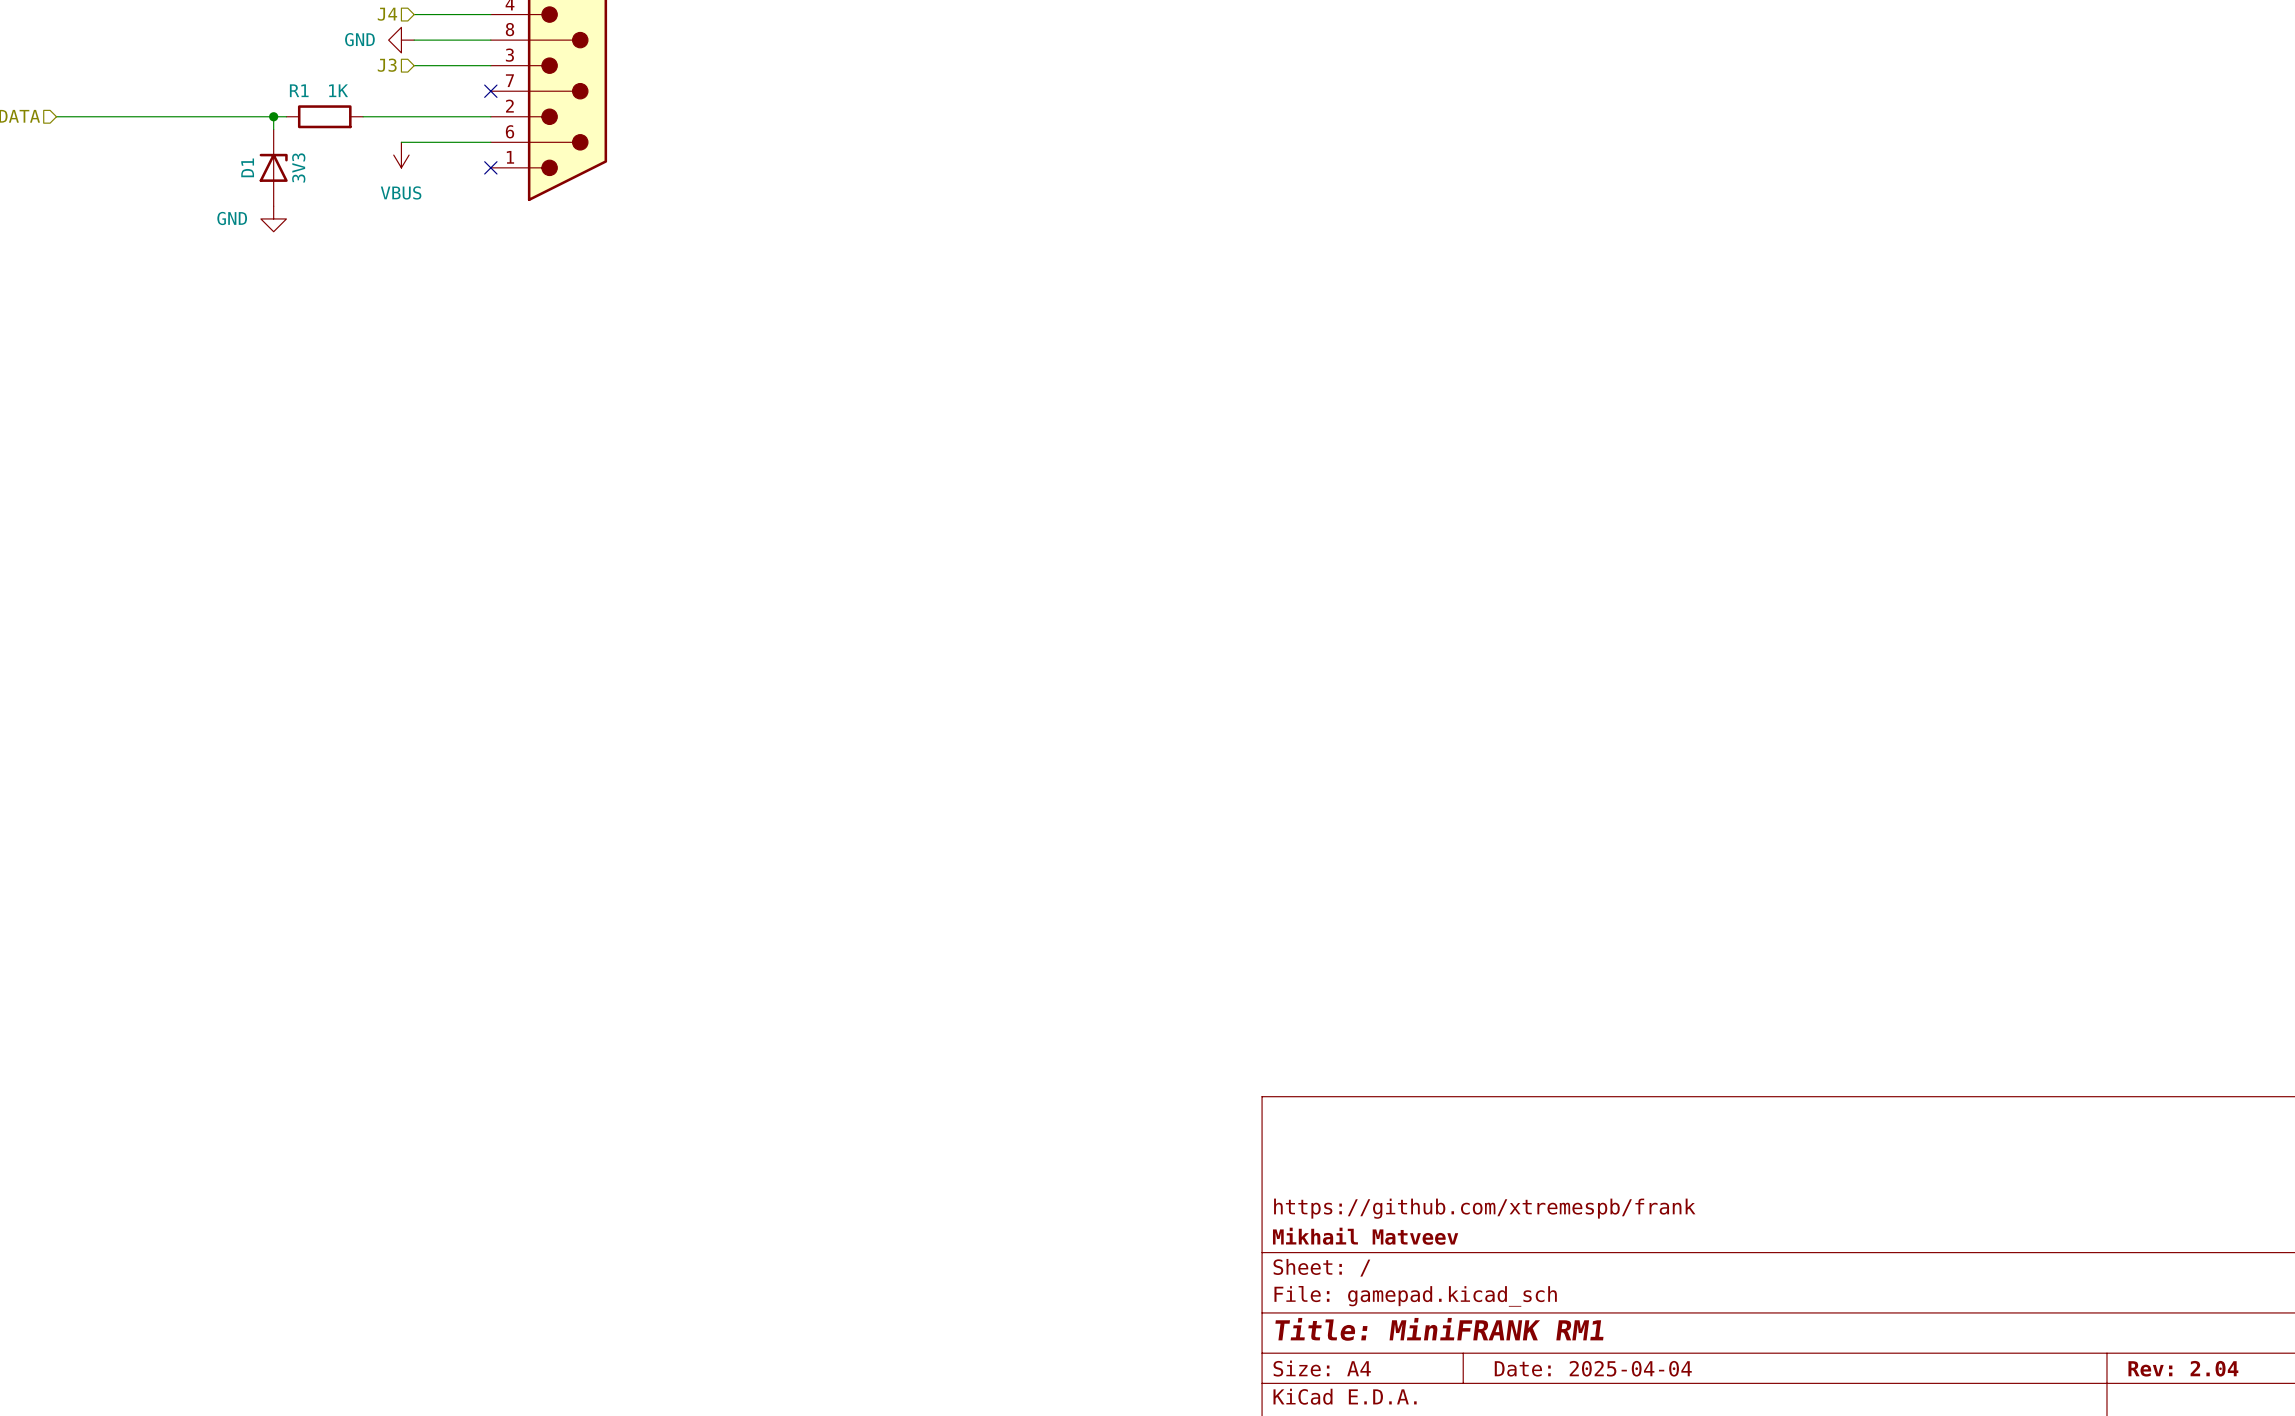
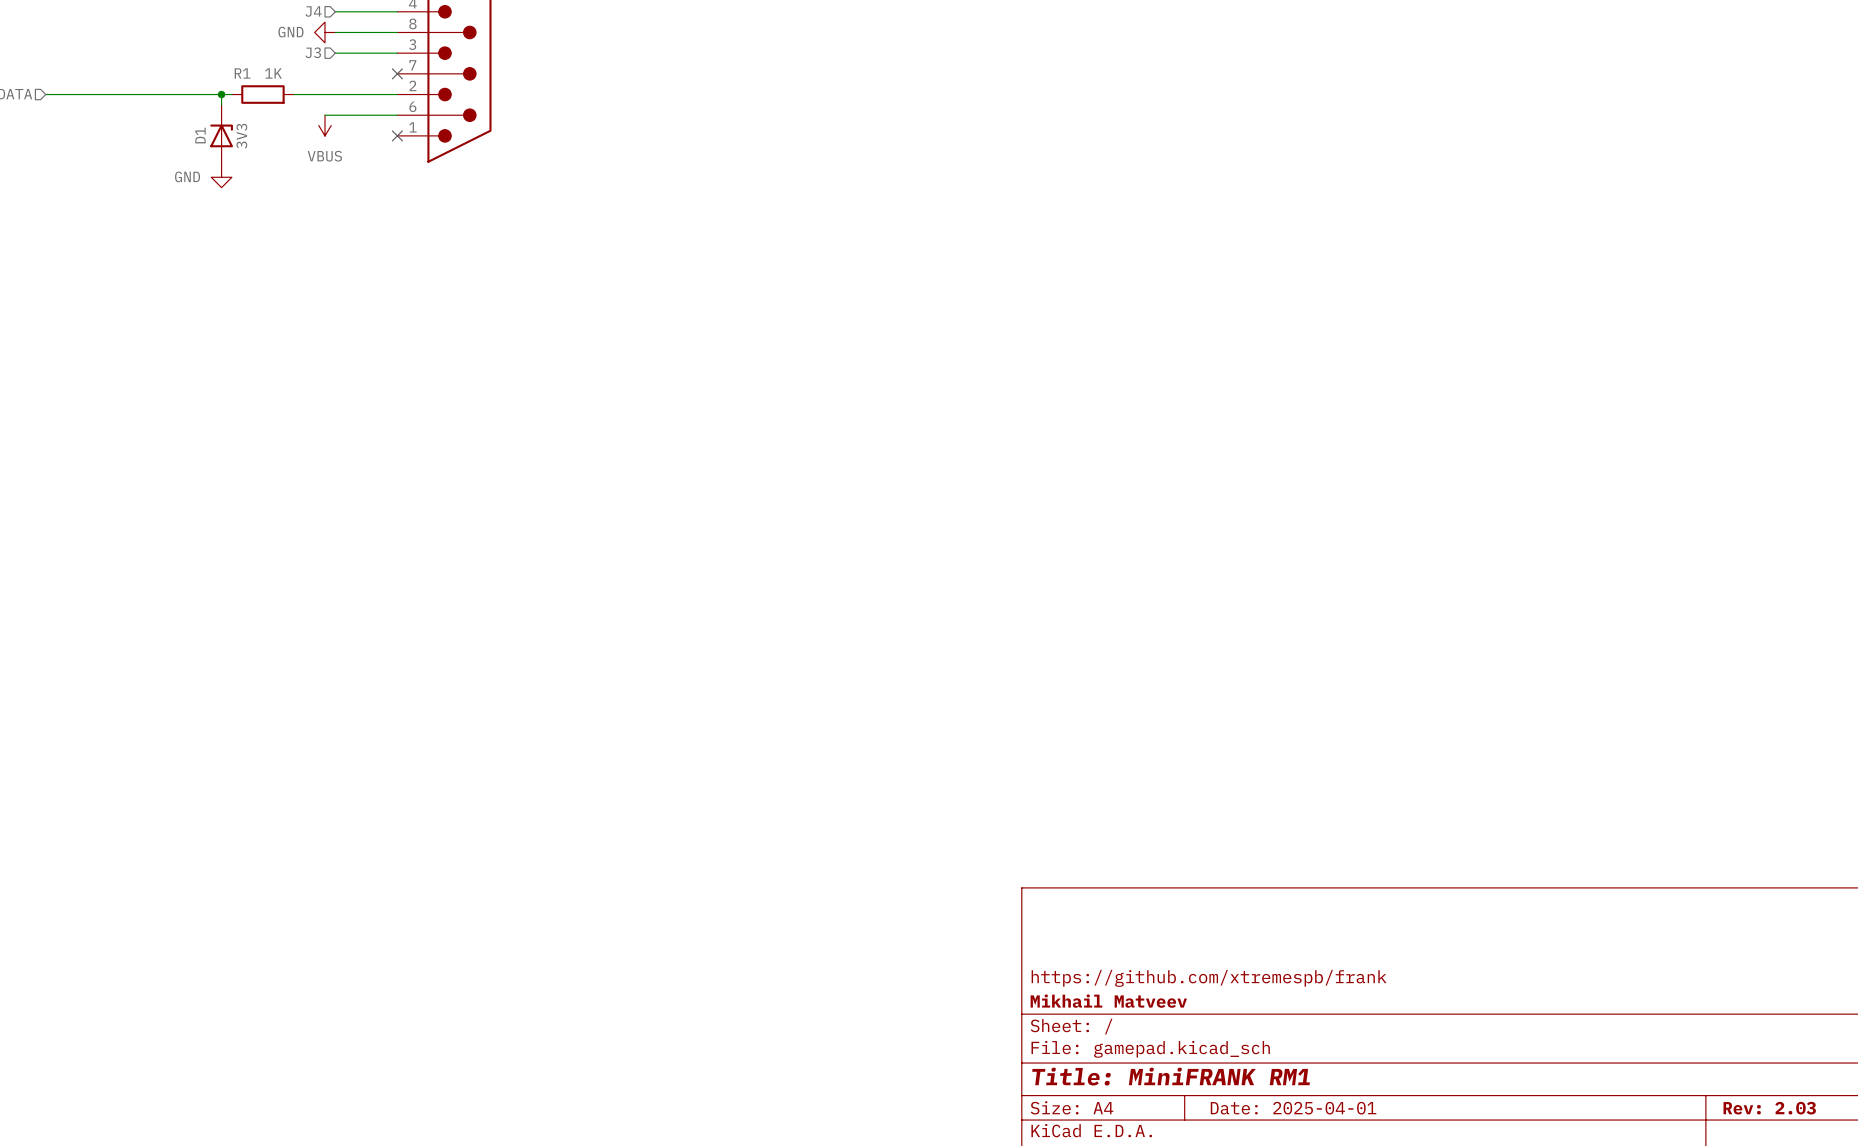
title block: Date: 2025-04-04 (1593, 1368) -> Date: 2025-04-01 (1293, 1108)
title block: Rev: 2.04 (2183, 1368) -> Rev: 2.03 (1769, 1108)

